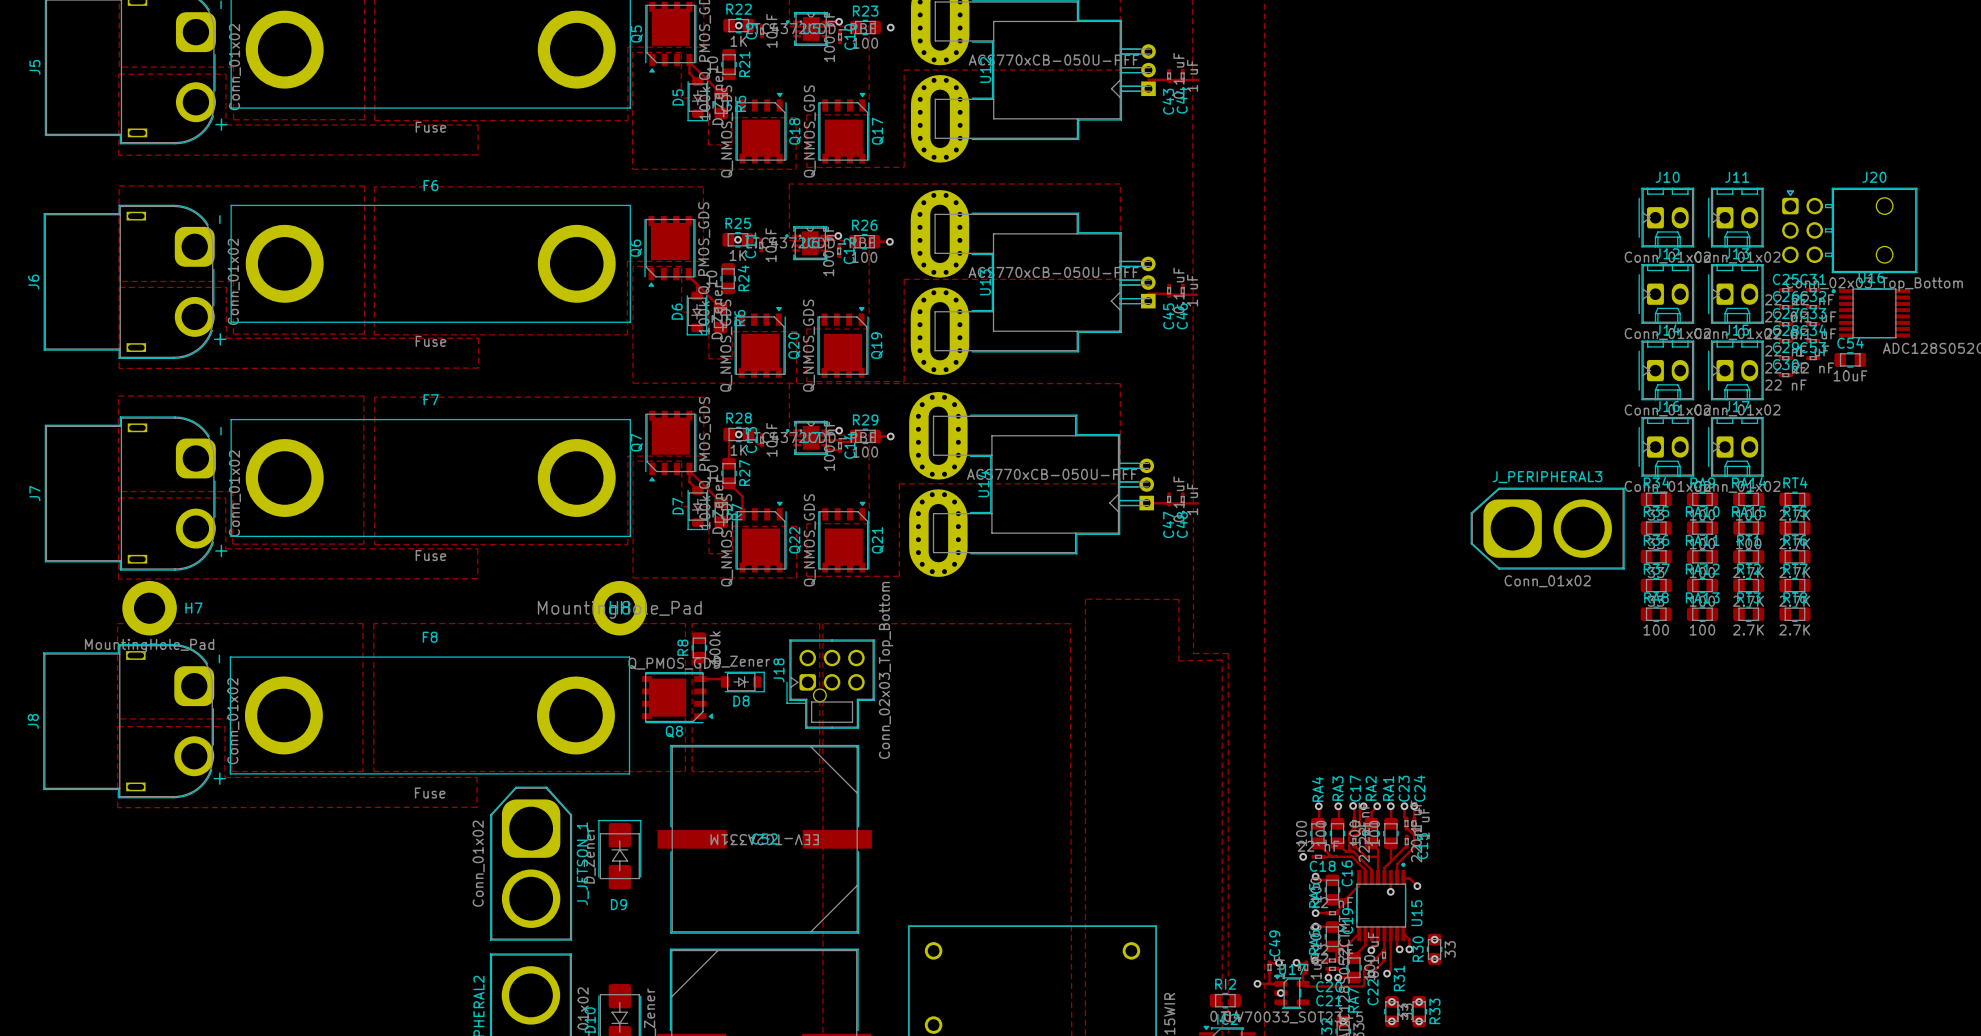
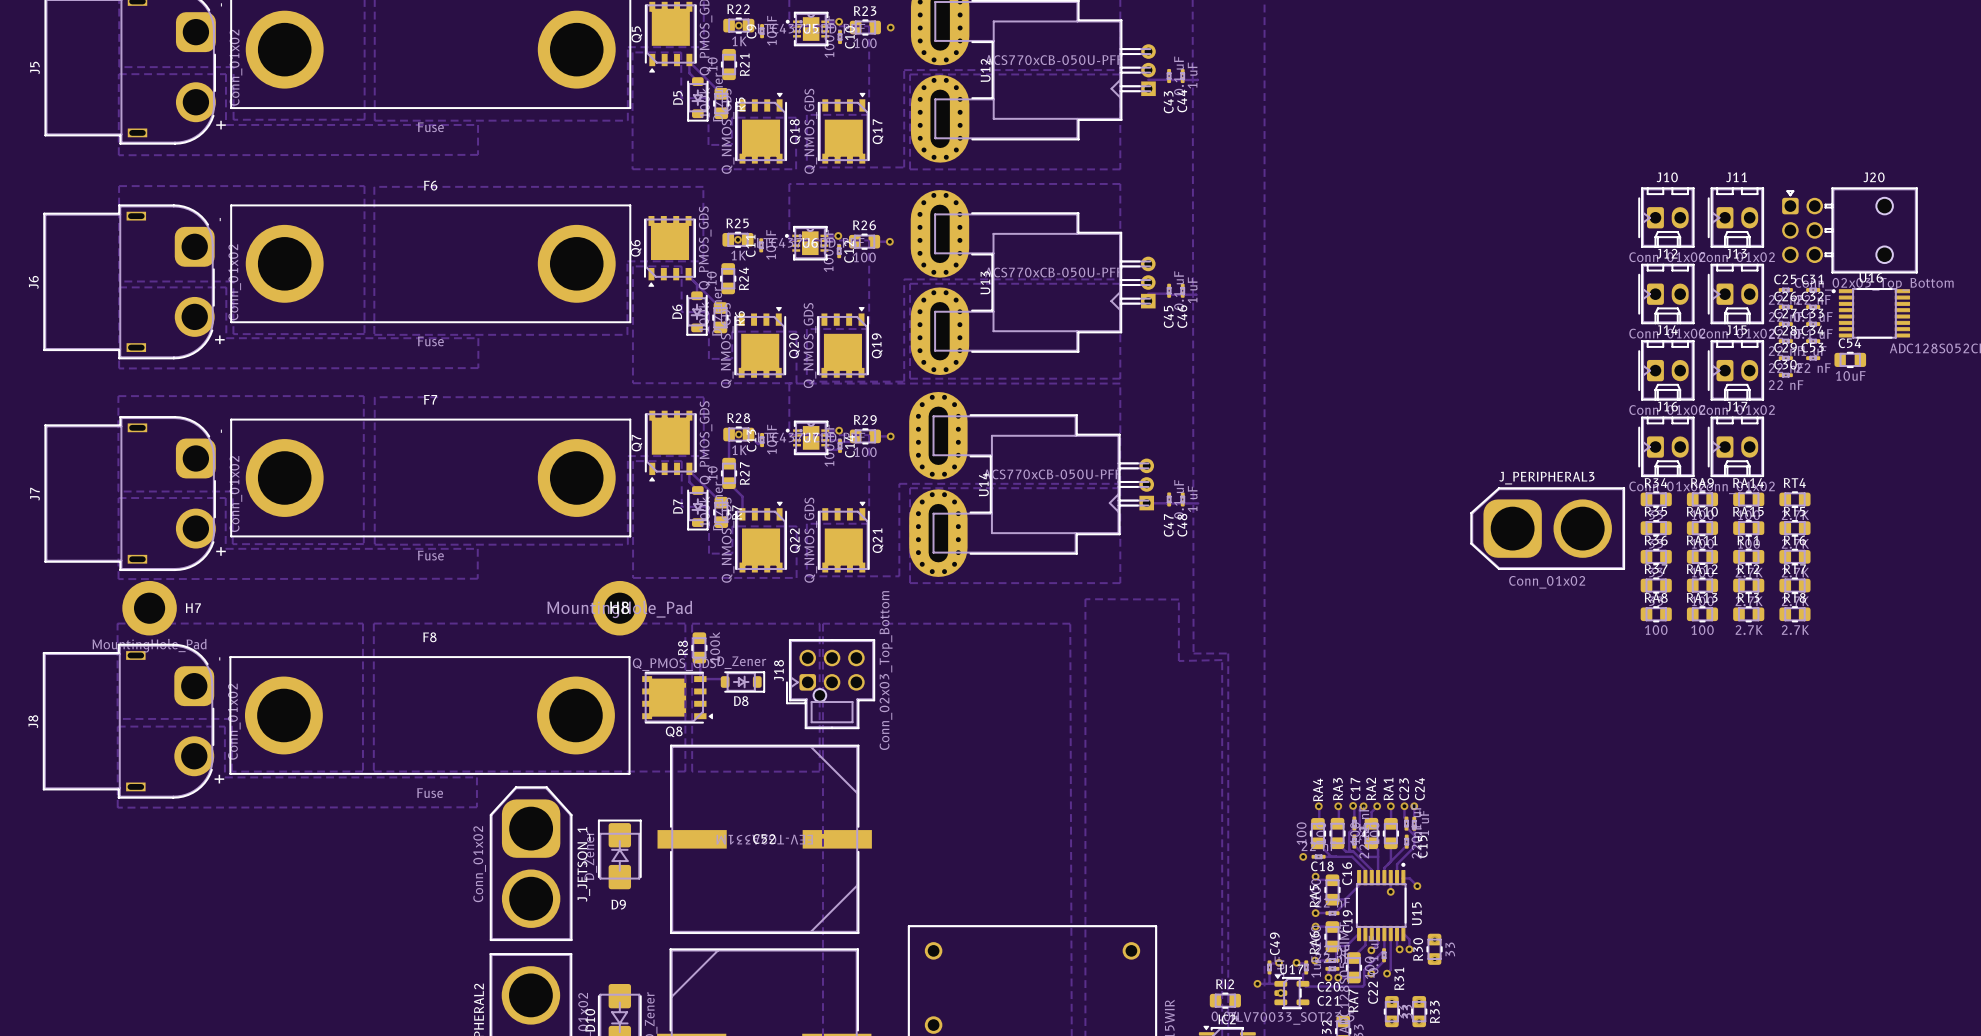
zone outline: none -> (910, 74) (1120, 74) (1120, 169) (910, 169) (910, 74)
zone outline: none -> (910, 283) (910, 378) (1120, 378) (1120, 283) (910, 283)
zone outline: none -> (910, 488) (910, 583) (1120, 583) (1120, 488) (910, 488)

